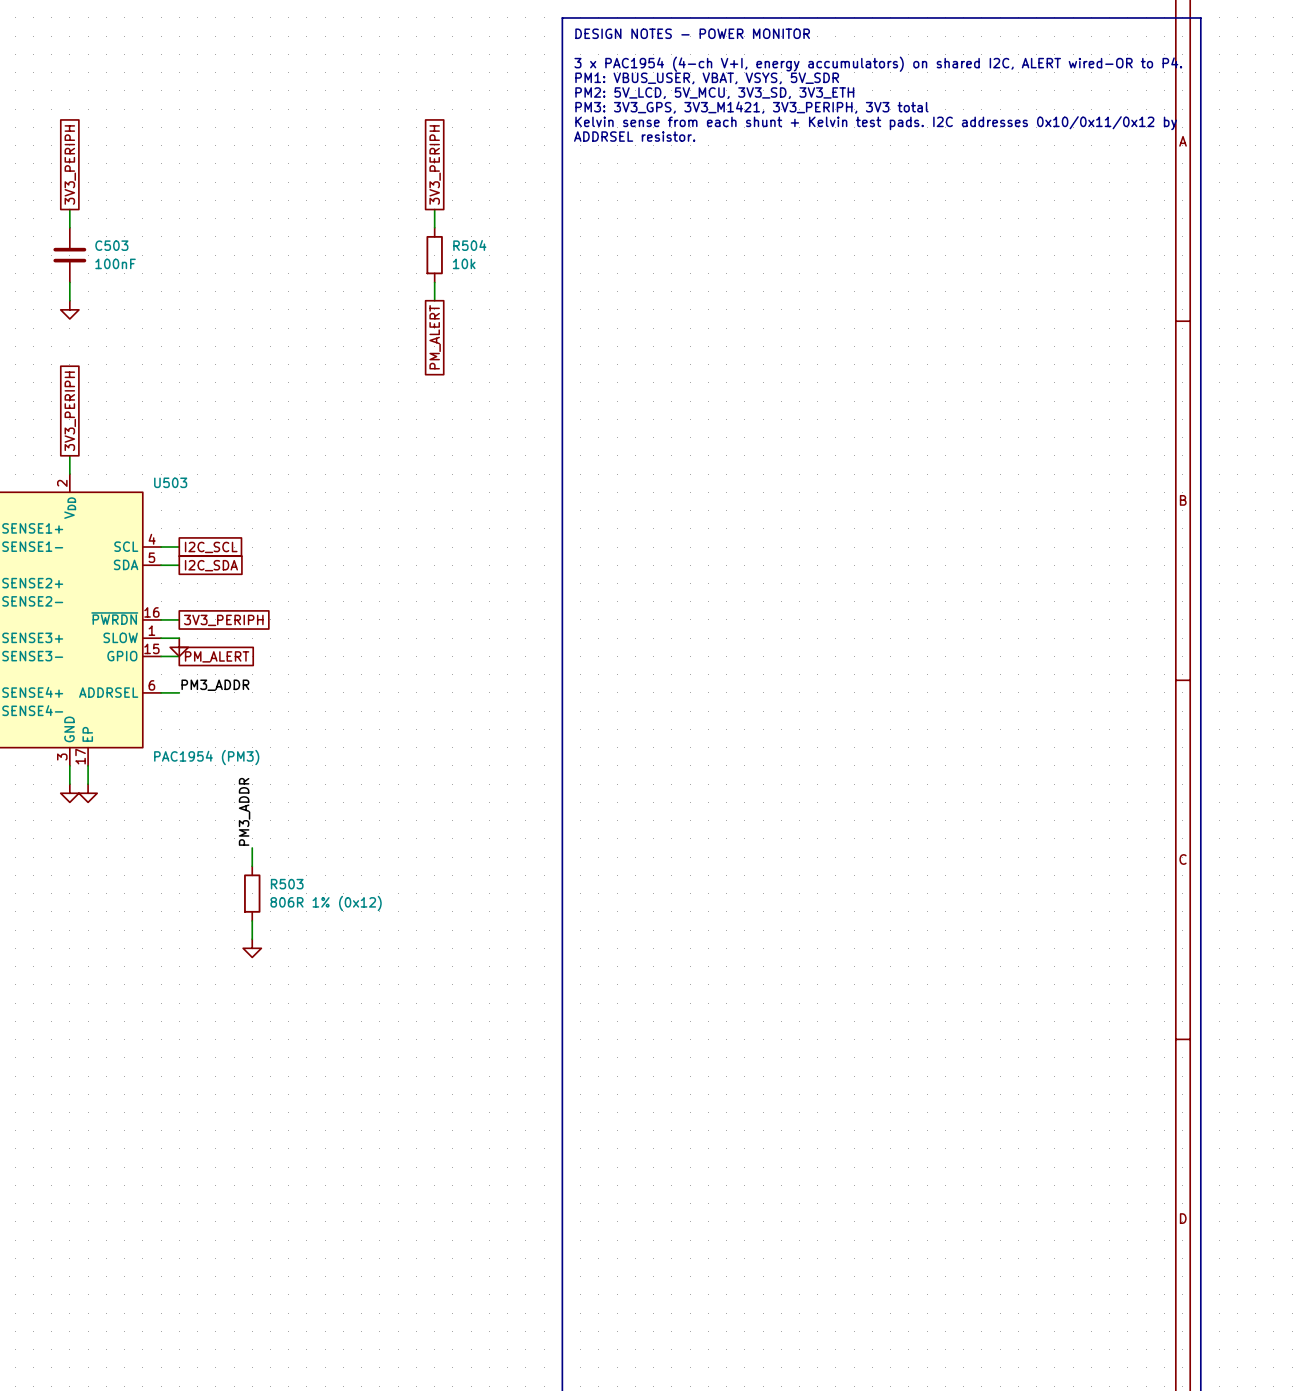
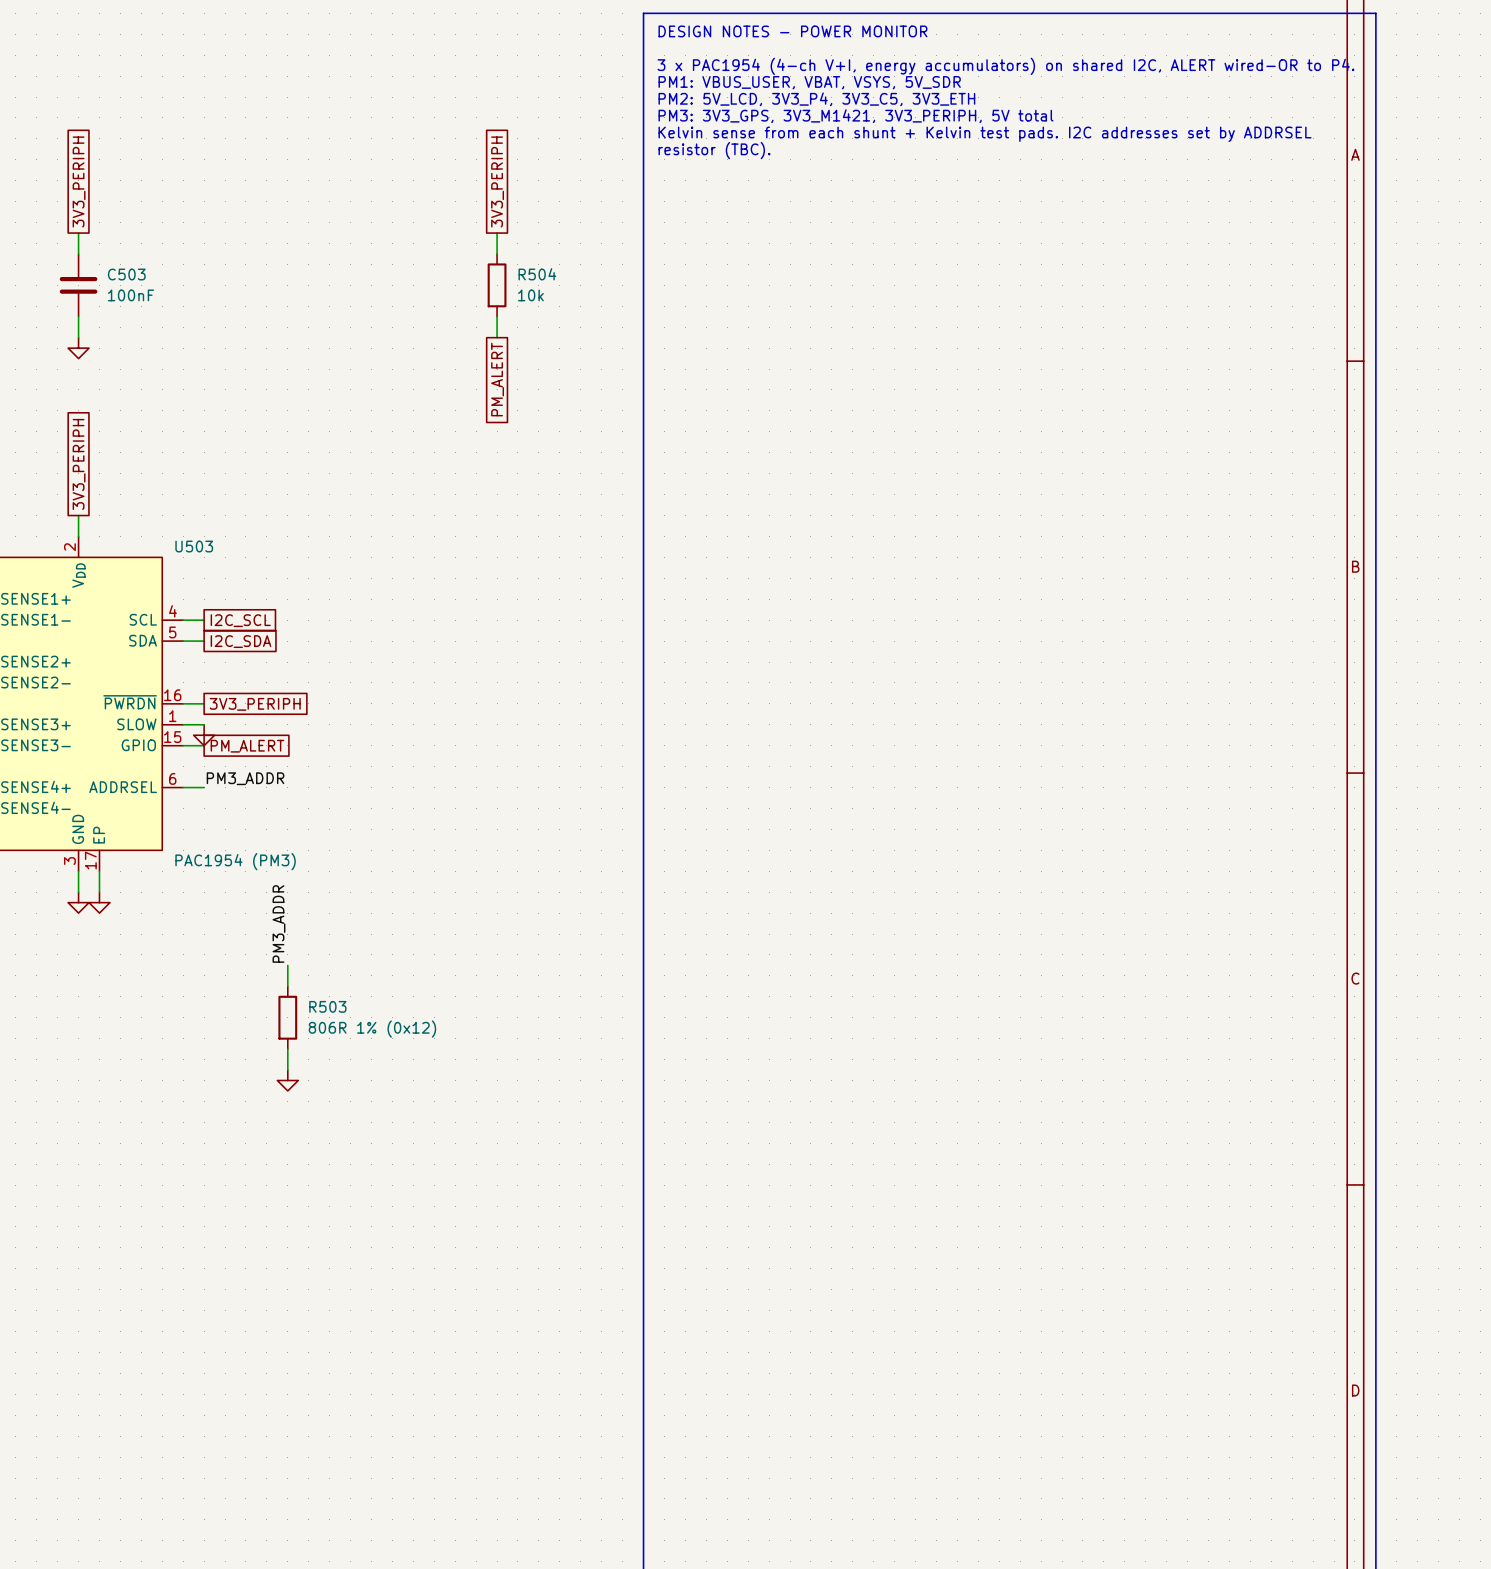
text: PM2: 5V_LCD, 5V_MCU, 3V3_SD, 3V3_ETH (714, 93) -> PM2: 5V_LCD, 3V3_P4, 3V3_C5, 3V3_ETH (816, 99)
text: PM3: 3V3_GPS, 3V3_M1421, 3V3_PERIPH, 3V3 total (751, 107) -> PM3: 3V3_GPS, 3V3_M1421, 3V3_PERIPH, 5V total (855, 116)
text: Kelvin sense from each shunt + Kelvin test pads. I2C addresses 0x10/0x11/0x12 by (876, 123) -> Kelvin sense from each shunt + Kelvin test pads. I2C addresses set by ADDRSEL (985, 134)
text: ADDRSEL resistor. (634, 136) -> resistor (TBC). (714, 150)

